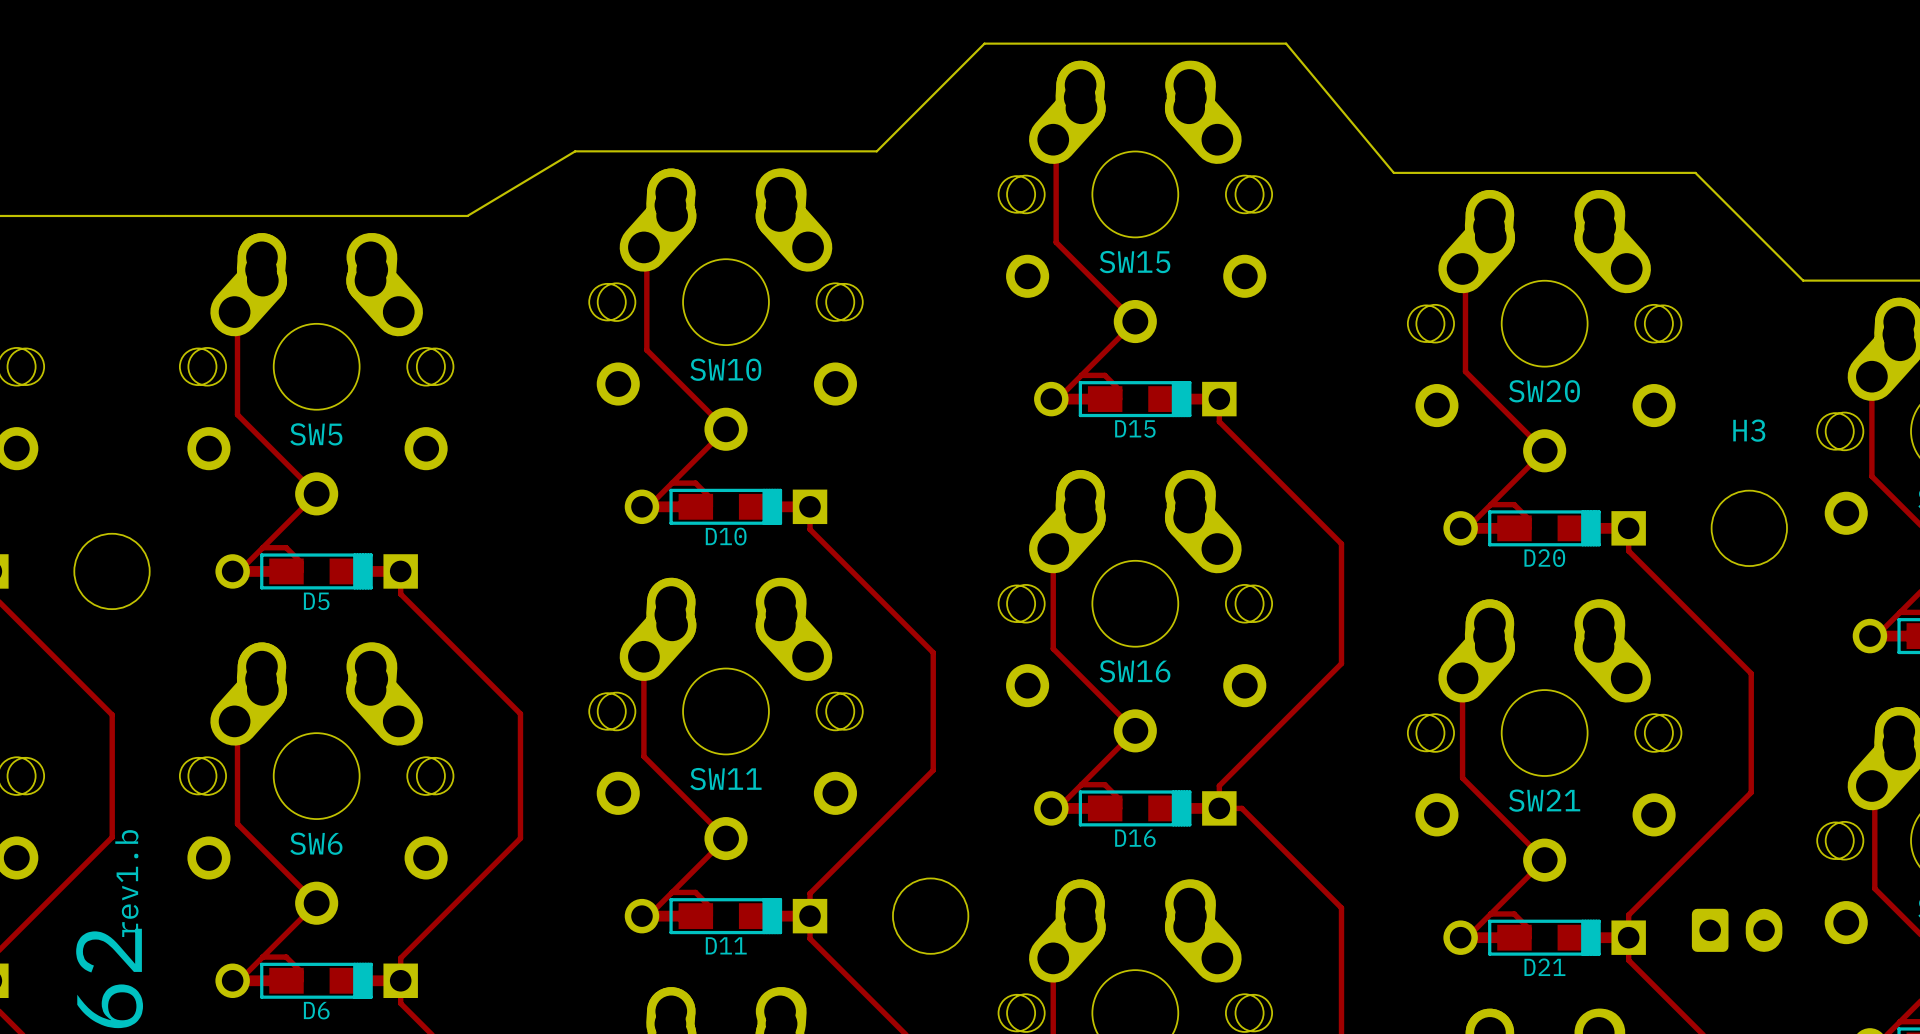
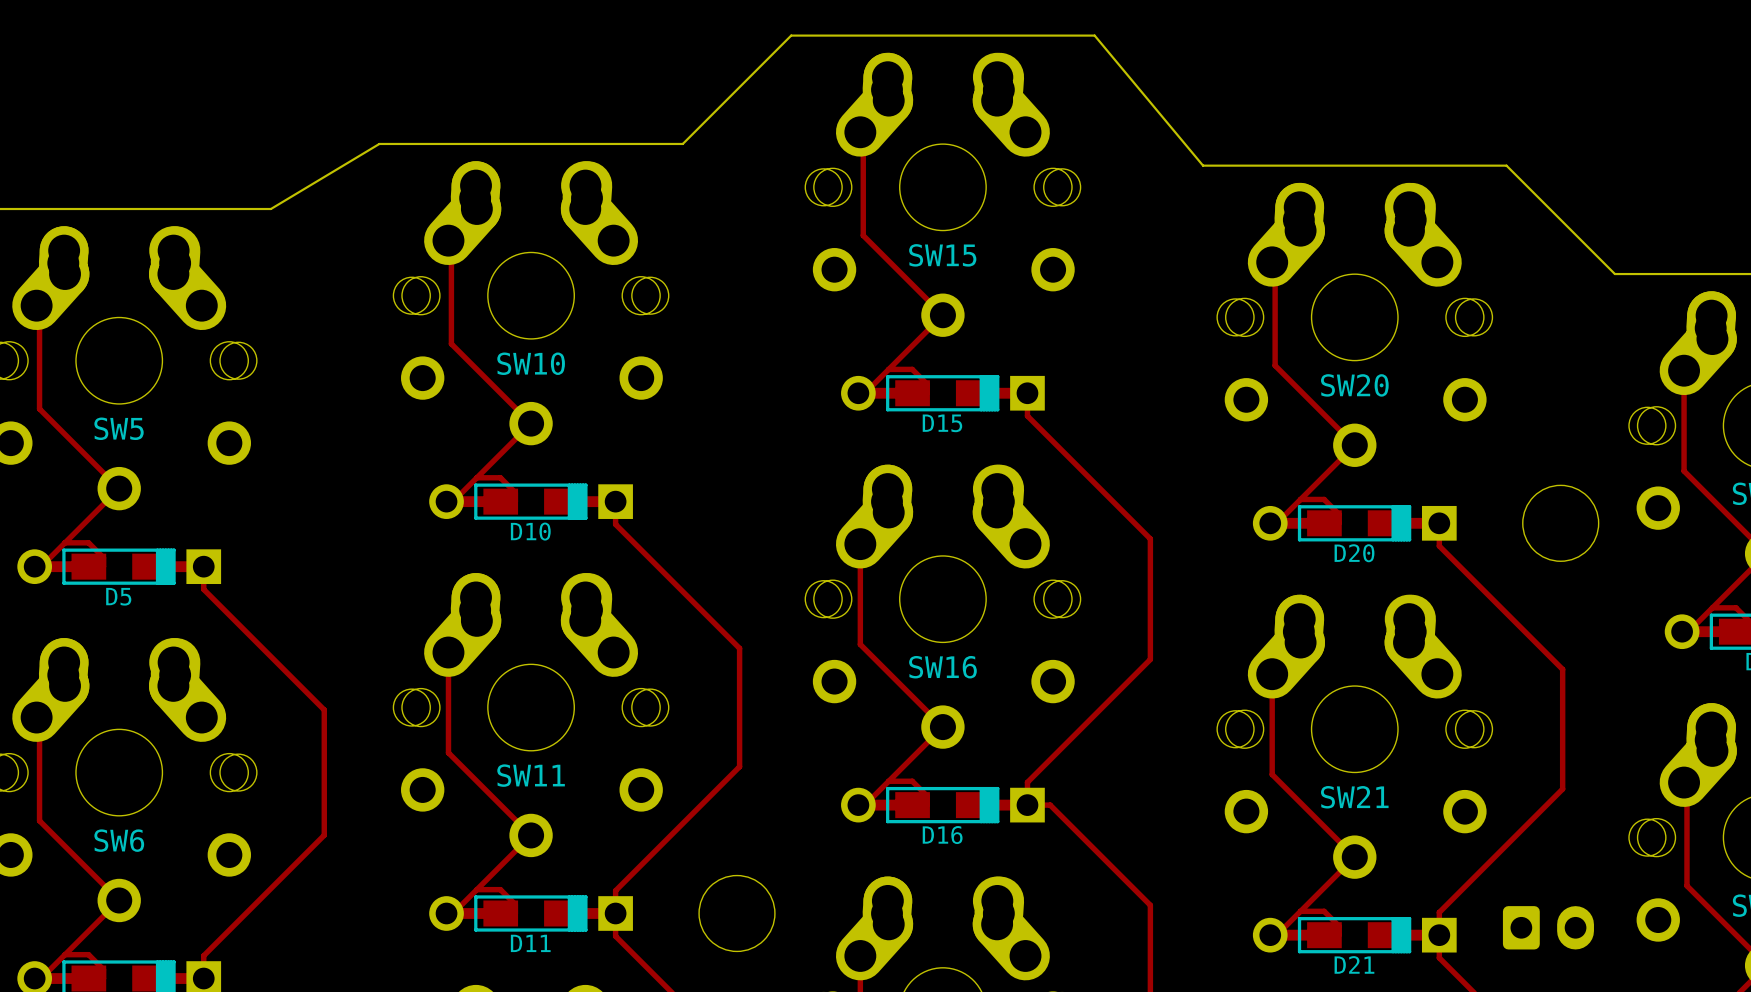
H3 name: H3 (1749, 430) -> none

